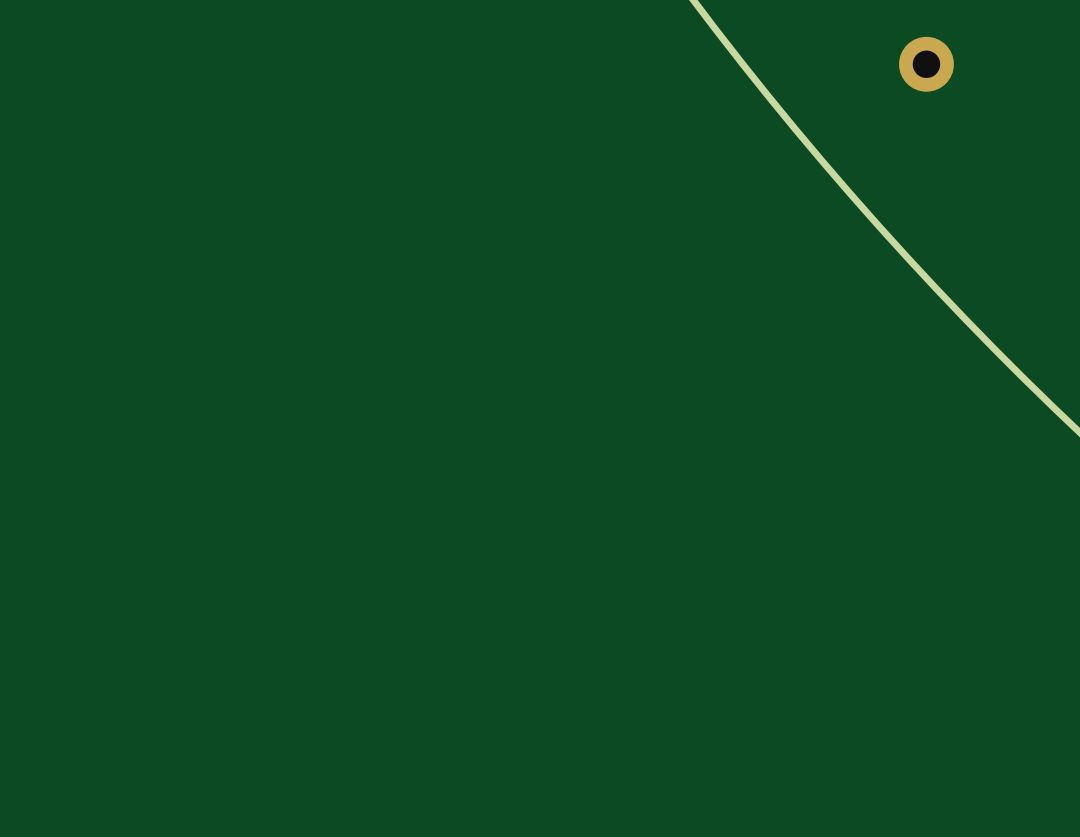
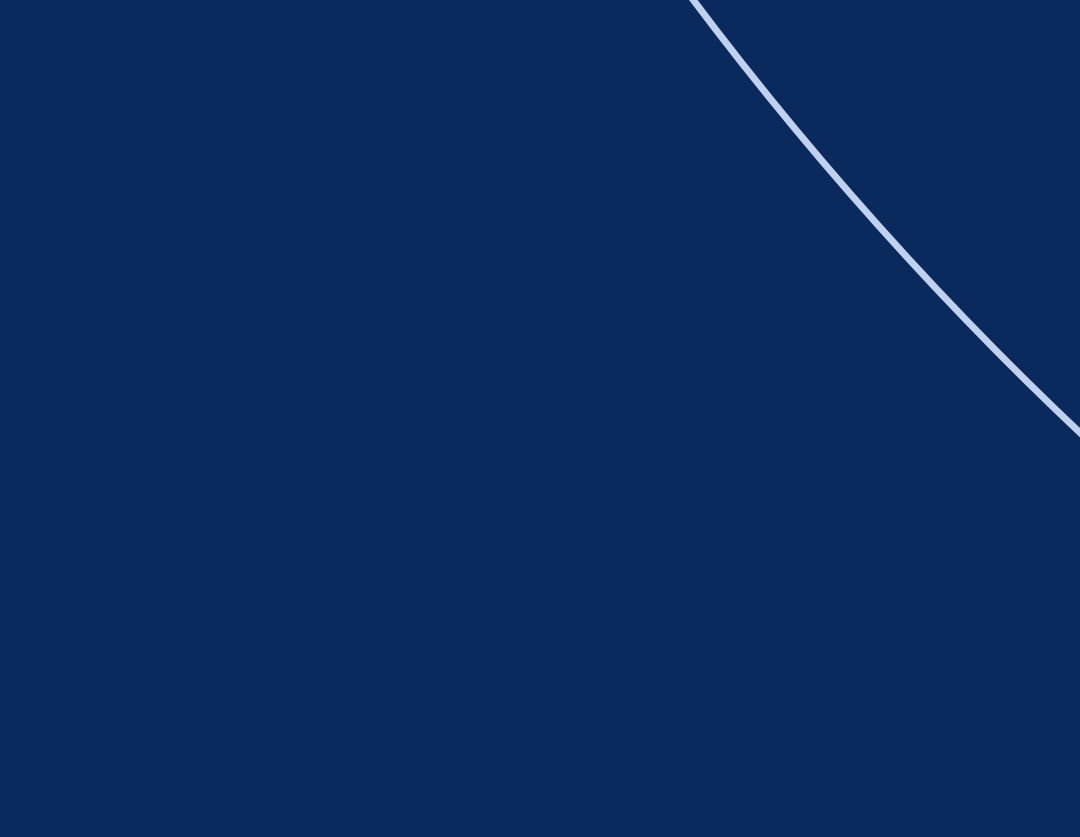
via: (926, 64) -> none

